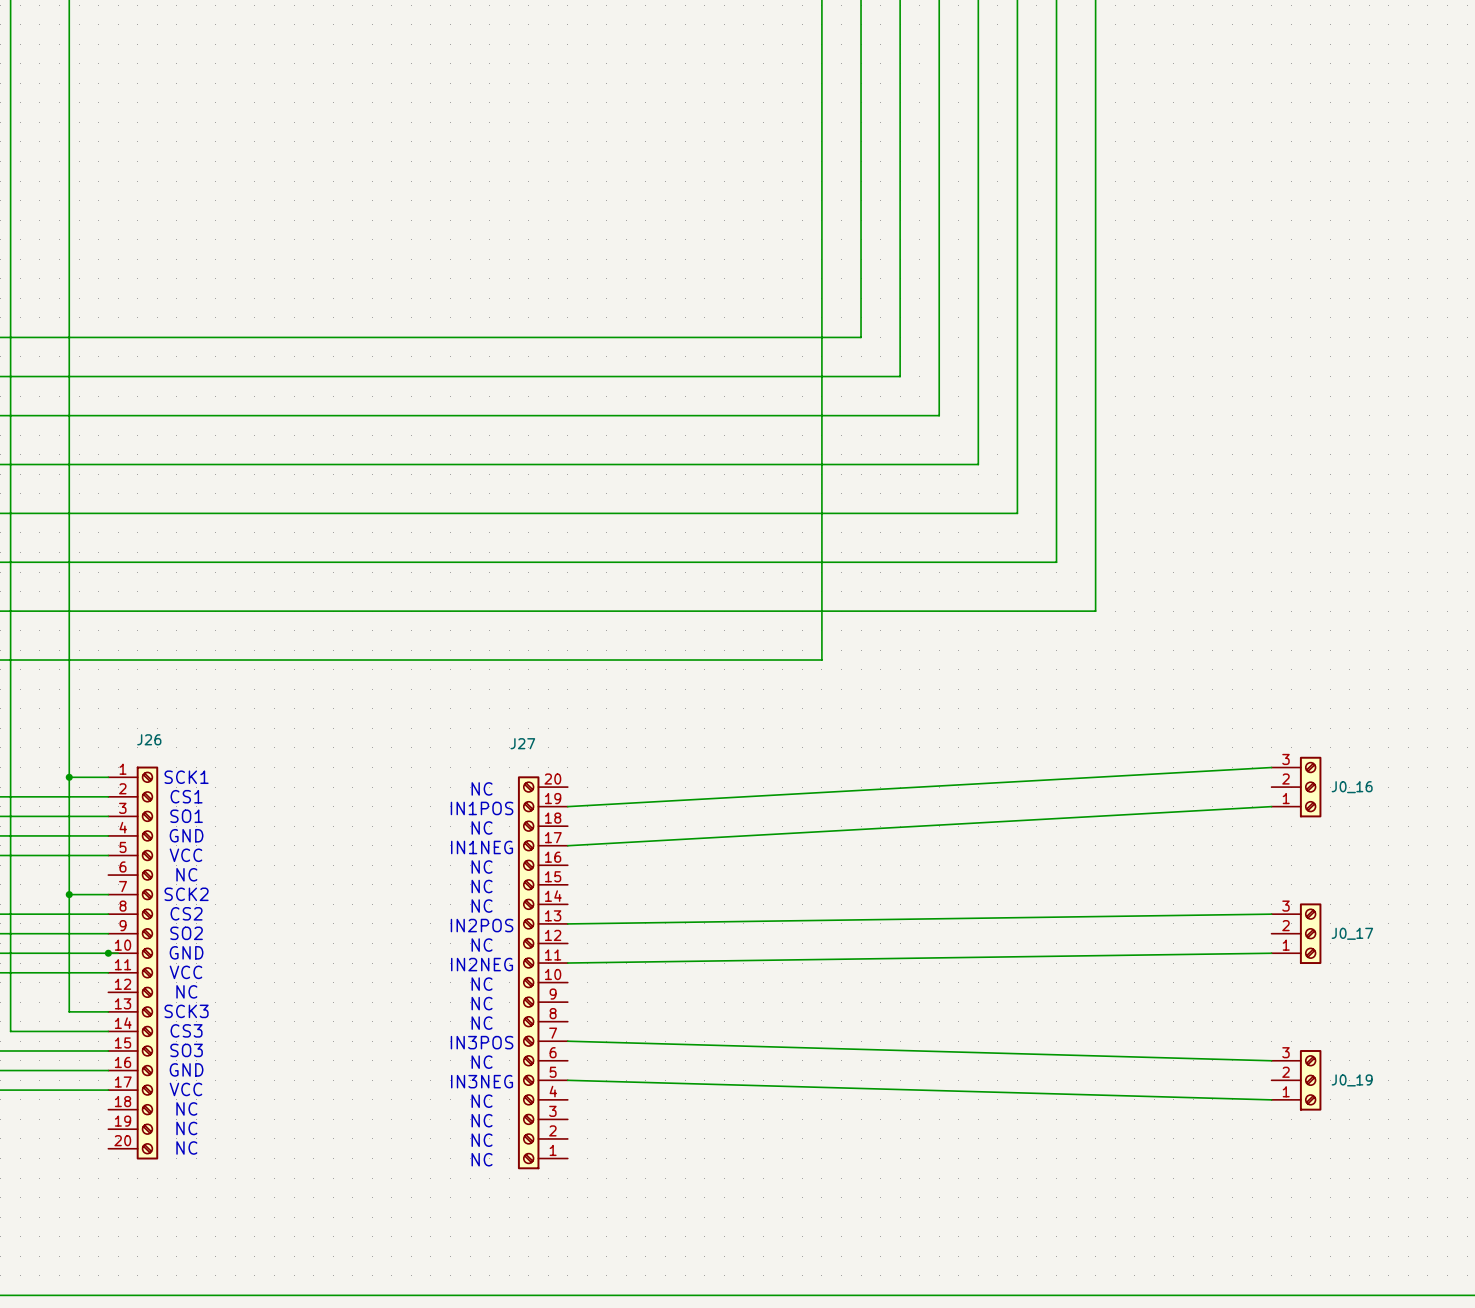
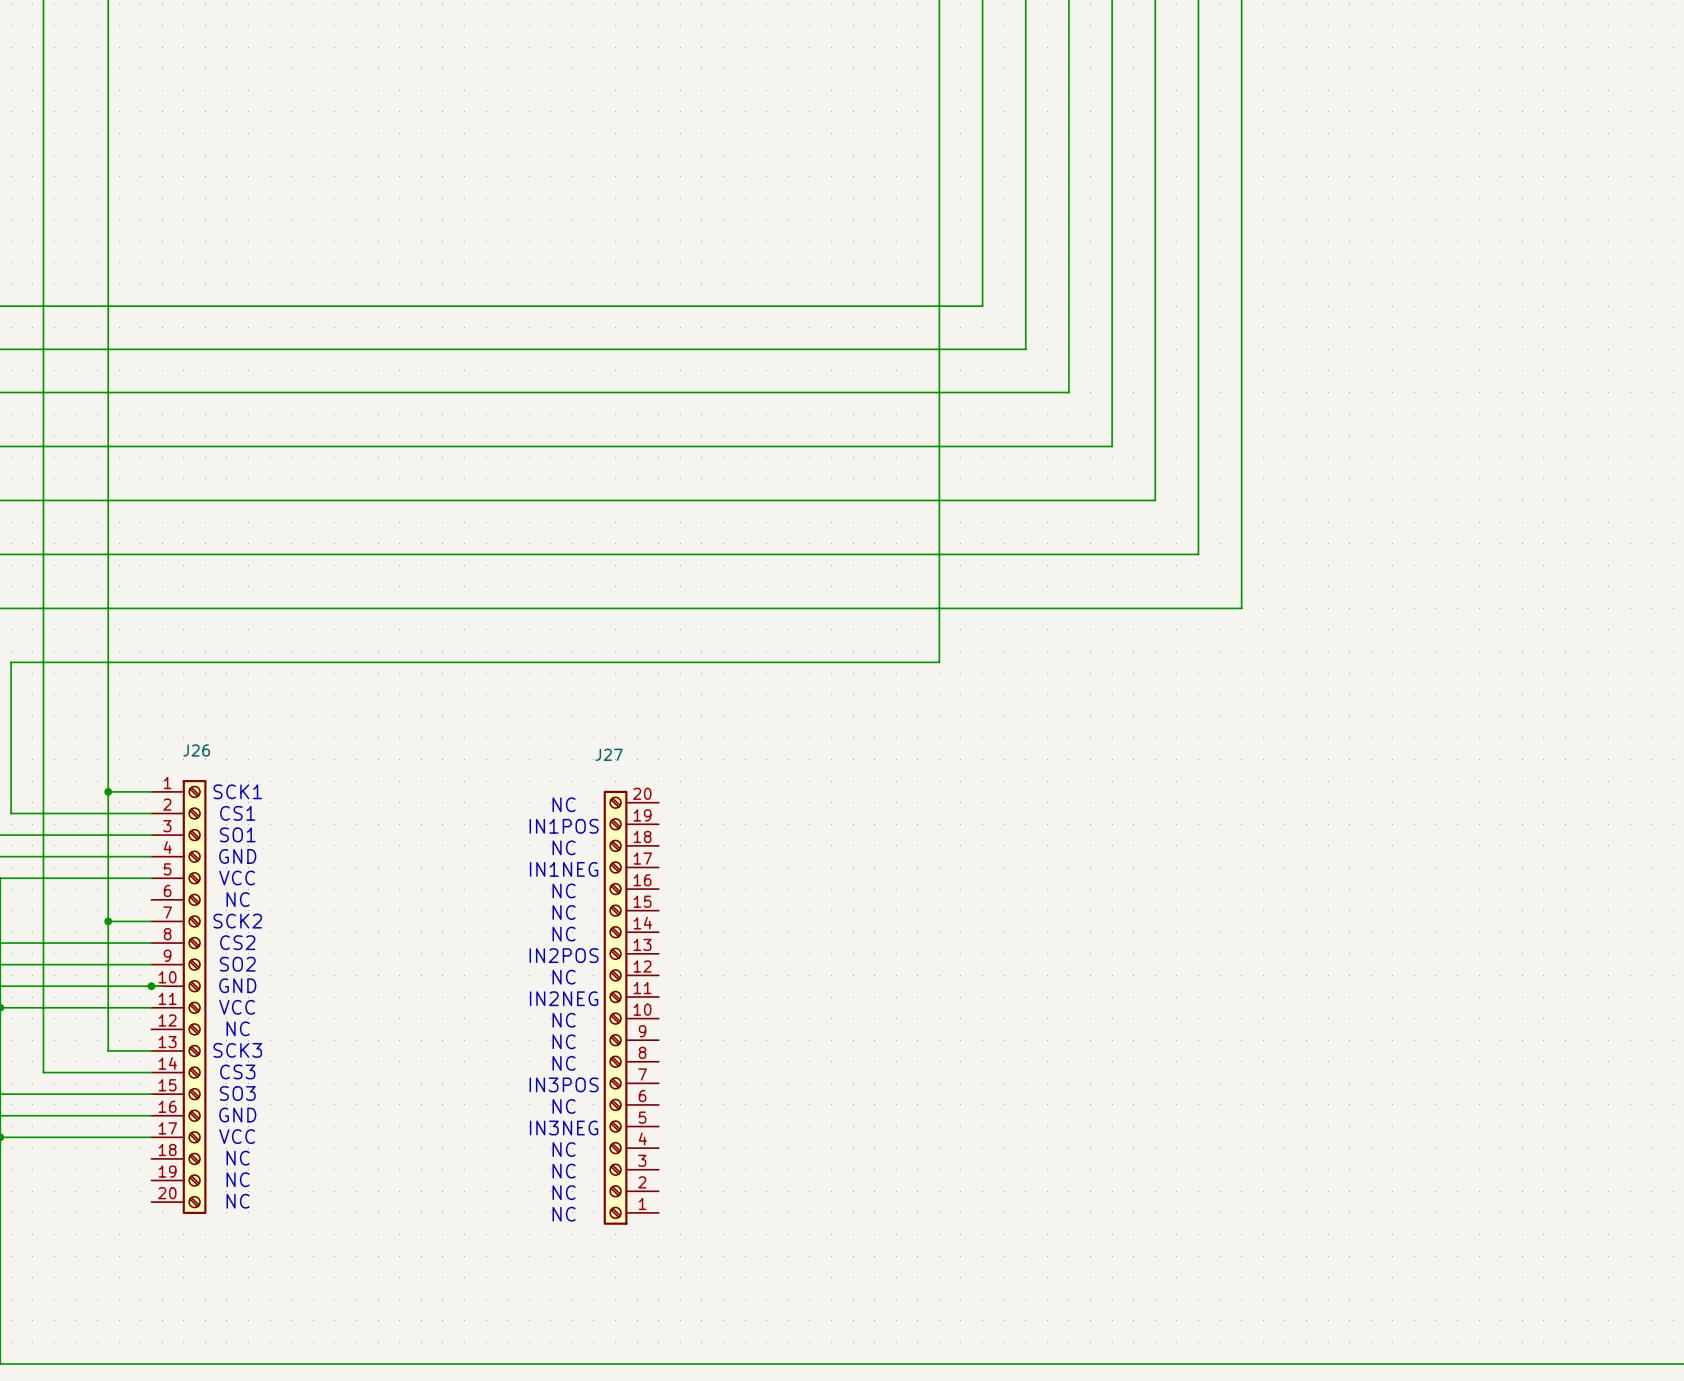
wire: (1271, 767) (567, 806) -> none
J0_16: (1296, 787) -> none
wire: (1271, 806) (567, 845) -> none
wire: (1271, 914) (567, 923) -> none
J0_17: (1296, 933) -> none
wire: (1271, 953) (567, 963) -> none
wire: (567, 1041) (1271, 1060) -> none
wire: (567, 1080) (1271, 1099) -> none
J0_19: (1296, 1080) -> none

